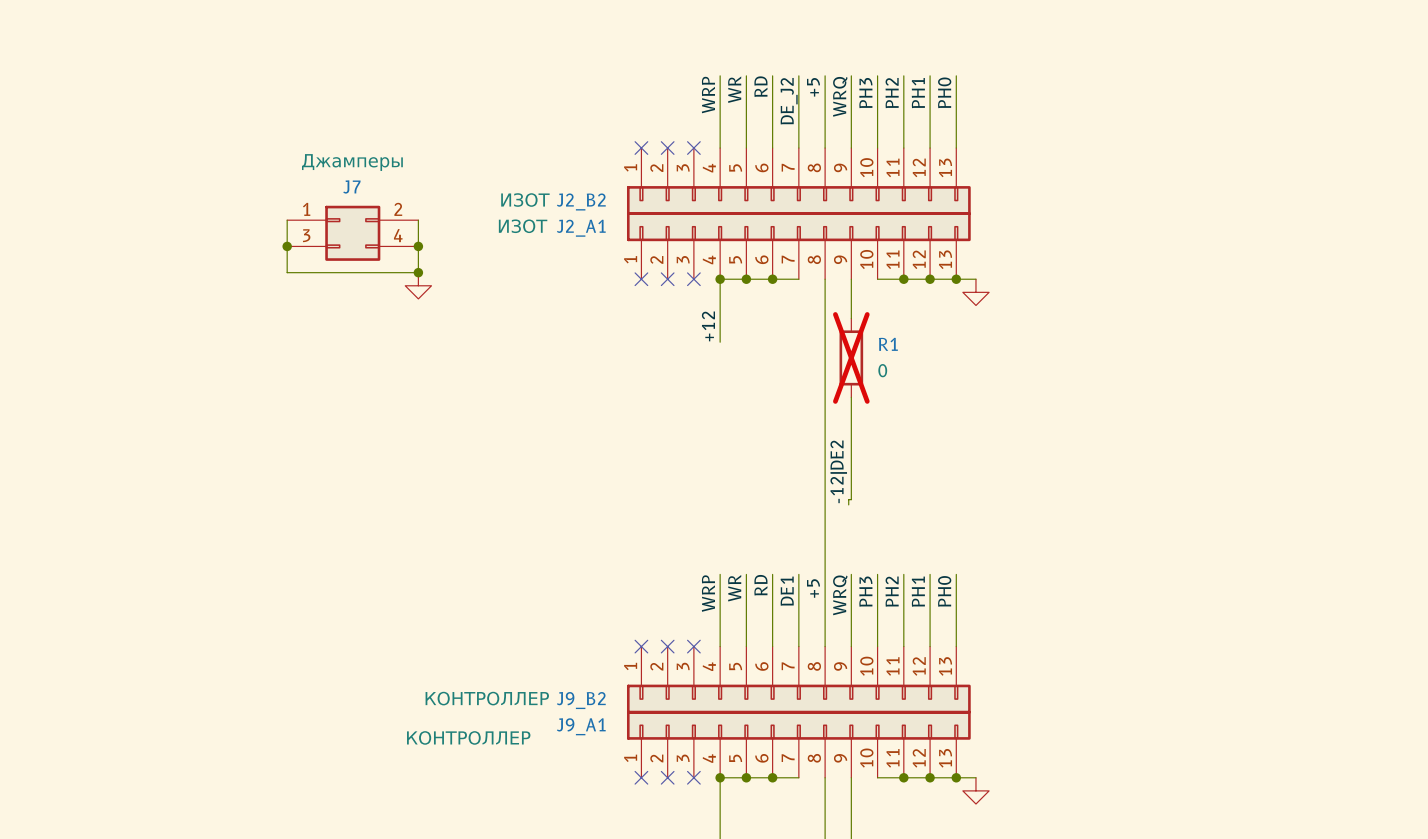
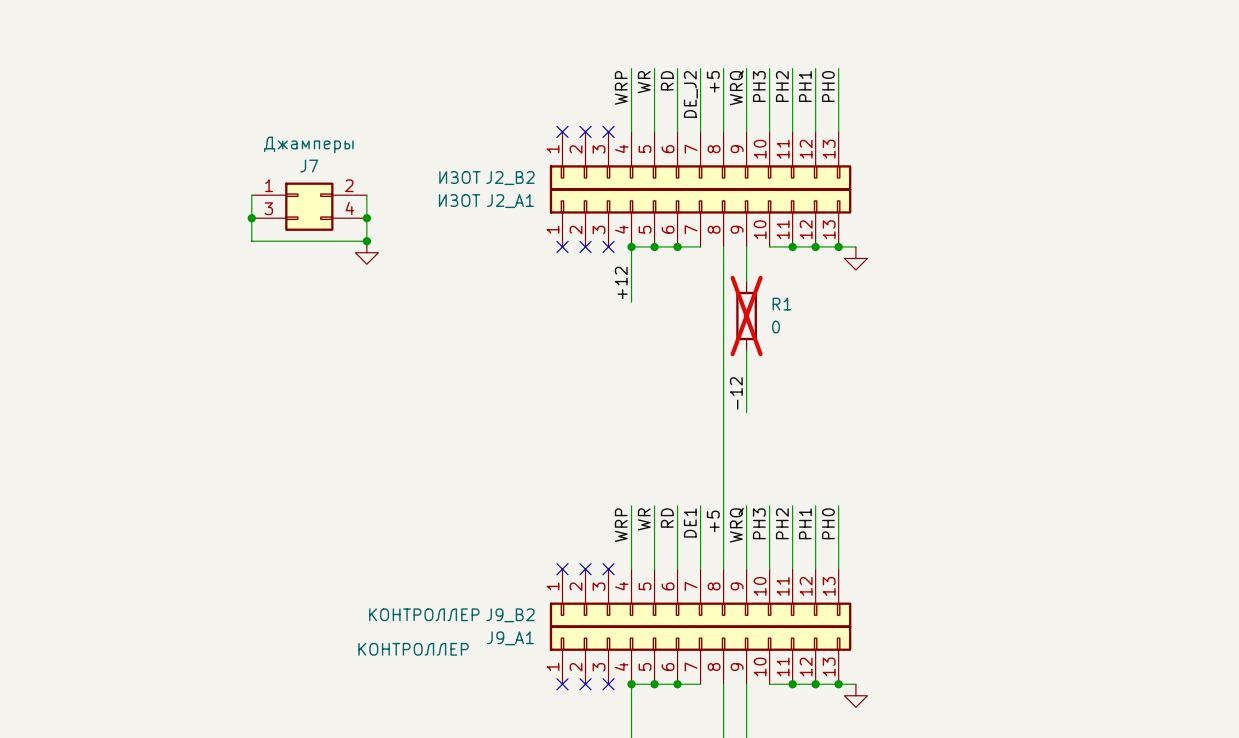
label: none -> -12 (736, 393)
wire: (851, 468) (851, 499) (848, 499) (848, 504) -> none
label: -12|DE2 (838, 471) -> none

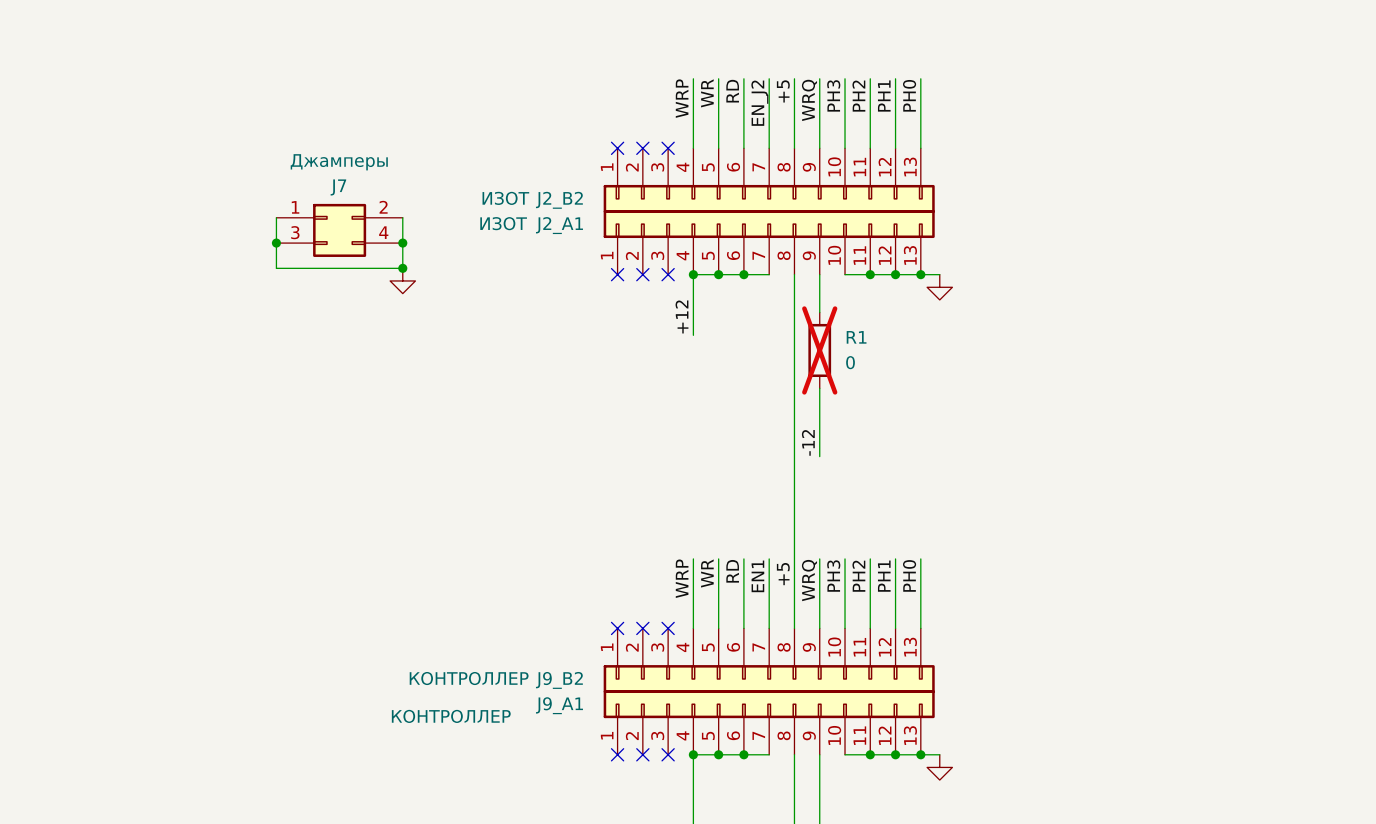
label: DE_J2 (690, 94) -> EN_J2 (759, 103)
label: DE1 (690, 522) -> EN1 (757, 576)

